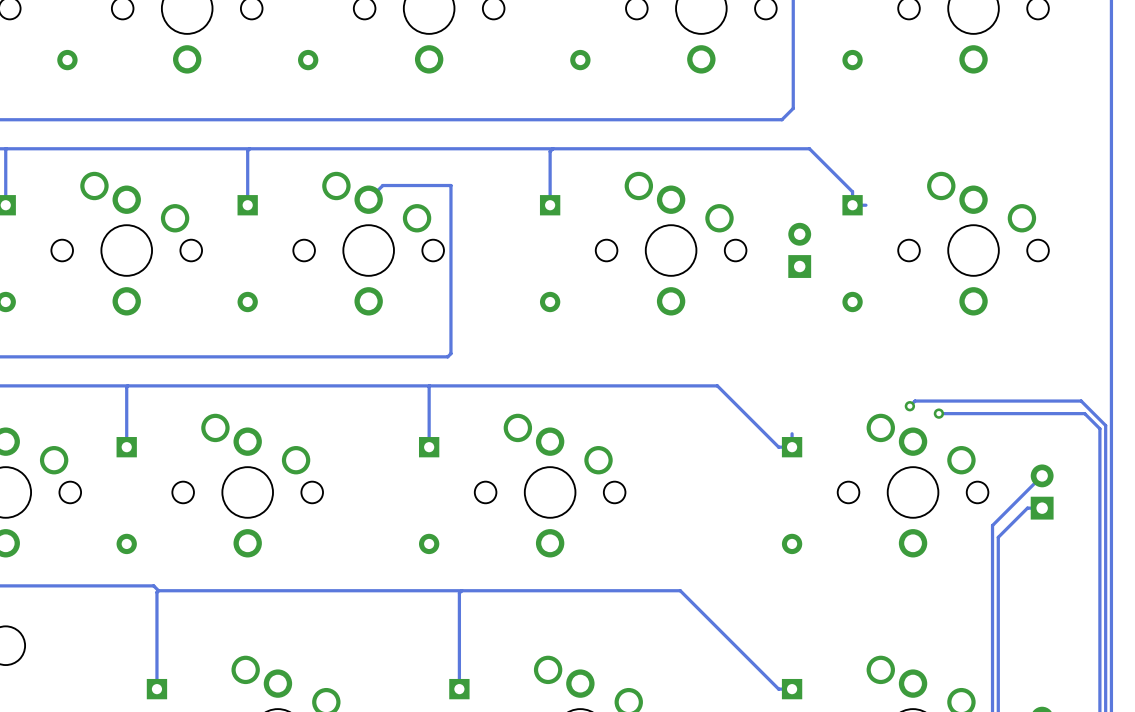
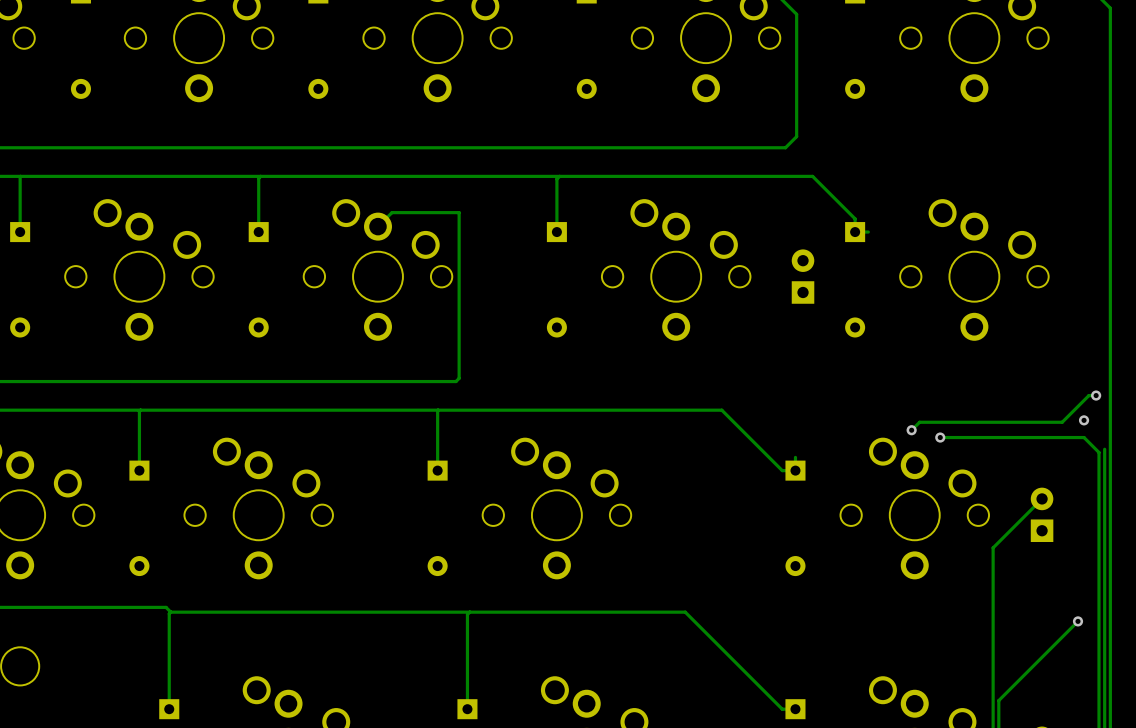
via: none -> (1096, 395)
via: none -> (1084, 420)
track: (915, 401) (1081, 401) (1105, 425) -> (916, 425) (919, 422) (1062, 422) (1088, 395) (1096, 395)
track: (1042, 508) (1027, 508) (998, 537) (998, 680) -> (1078, 621) (998, 700)
via: none -> (1078, 621)

